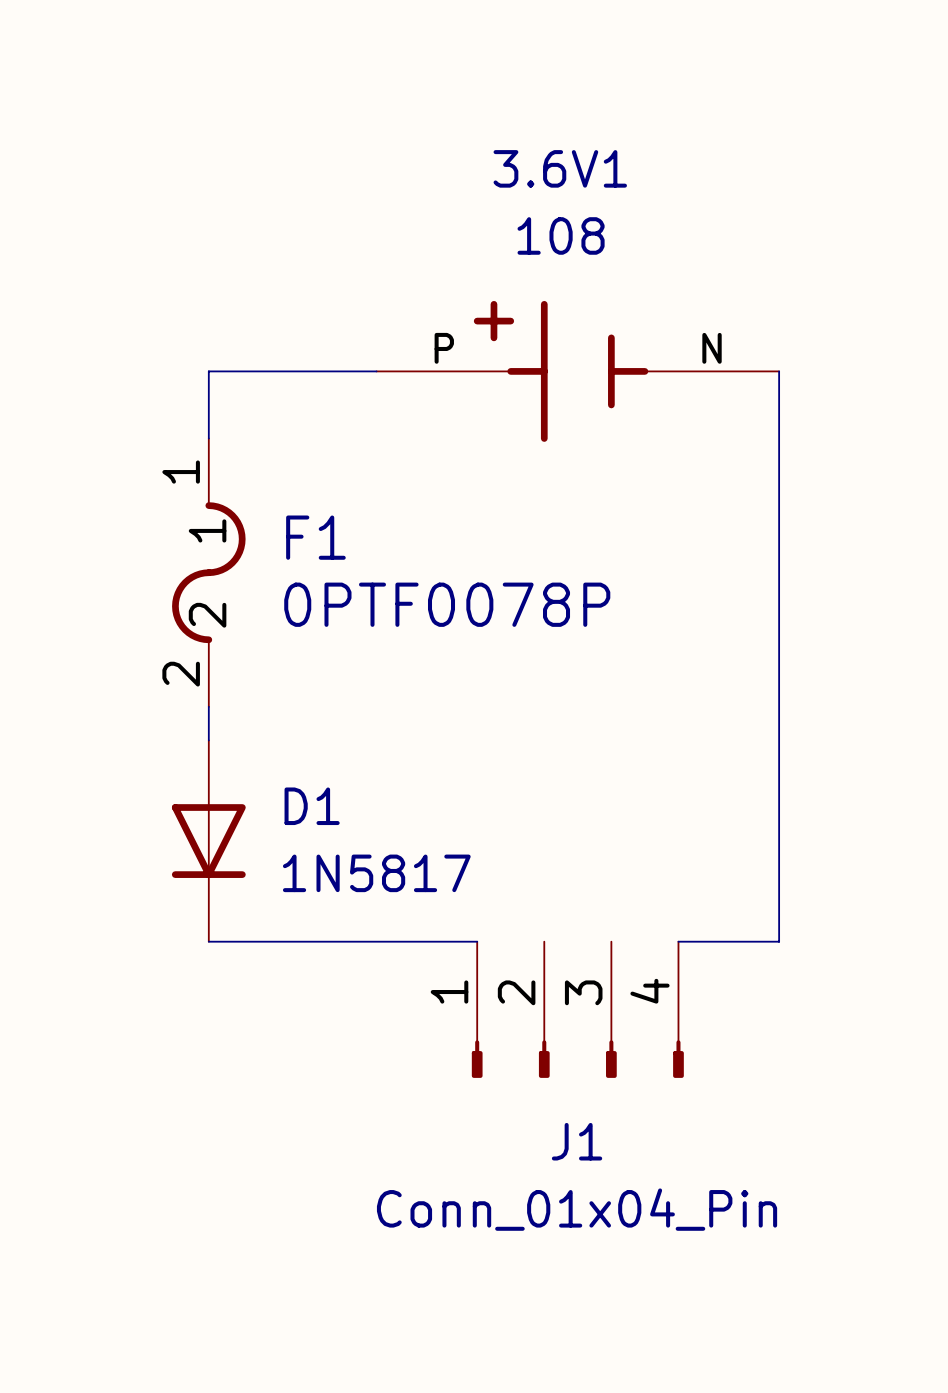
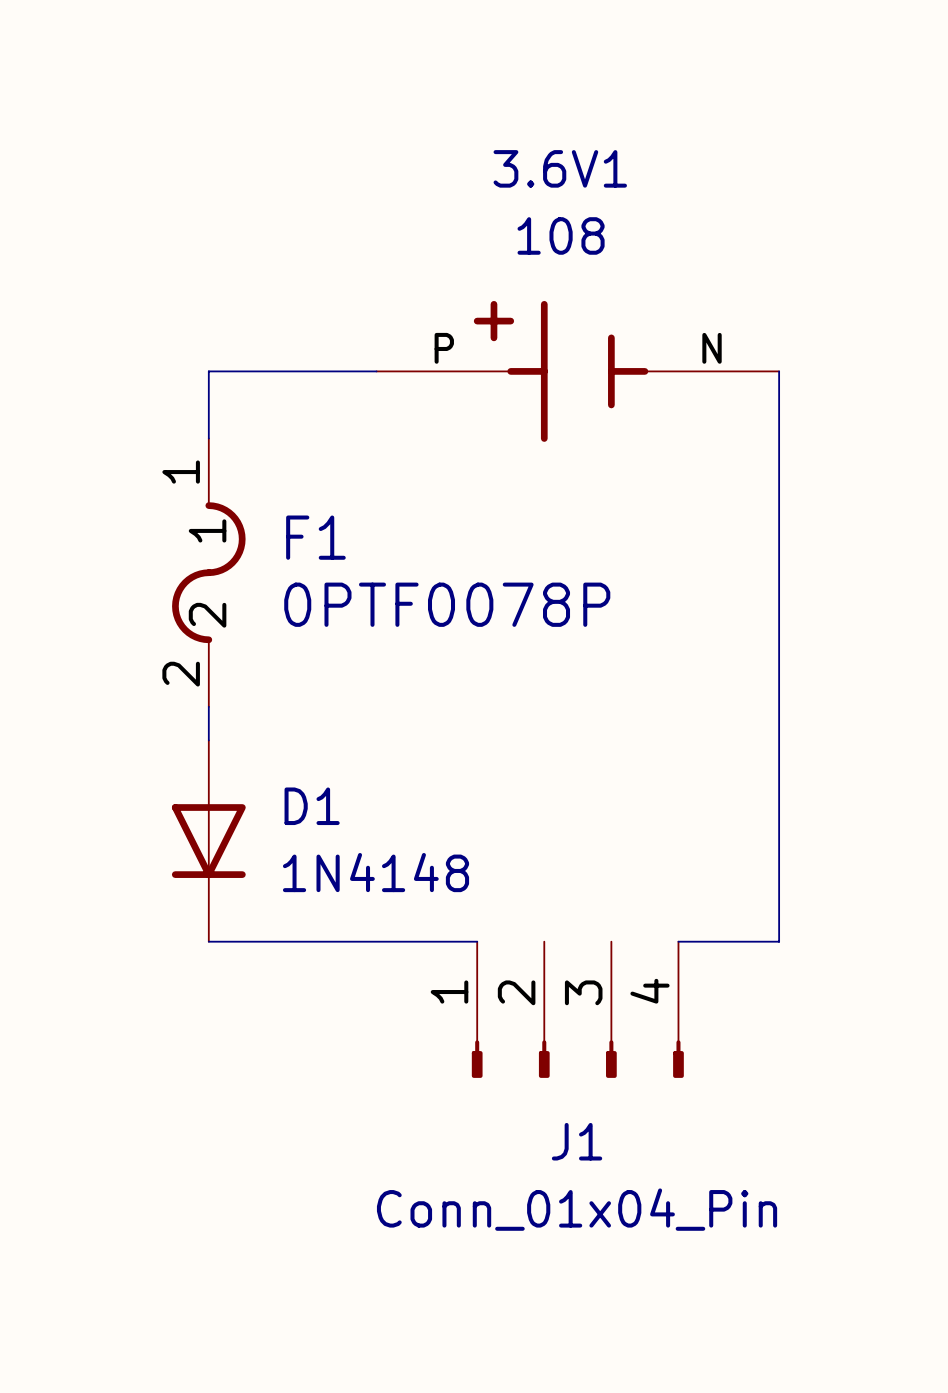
D1 value: 1N5817 (376, 873) -> 1N4148 (376, 872)

